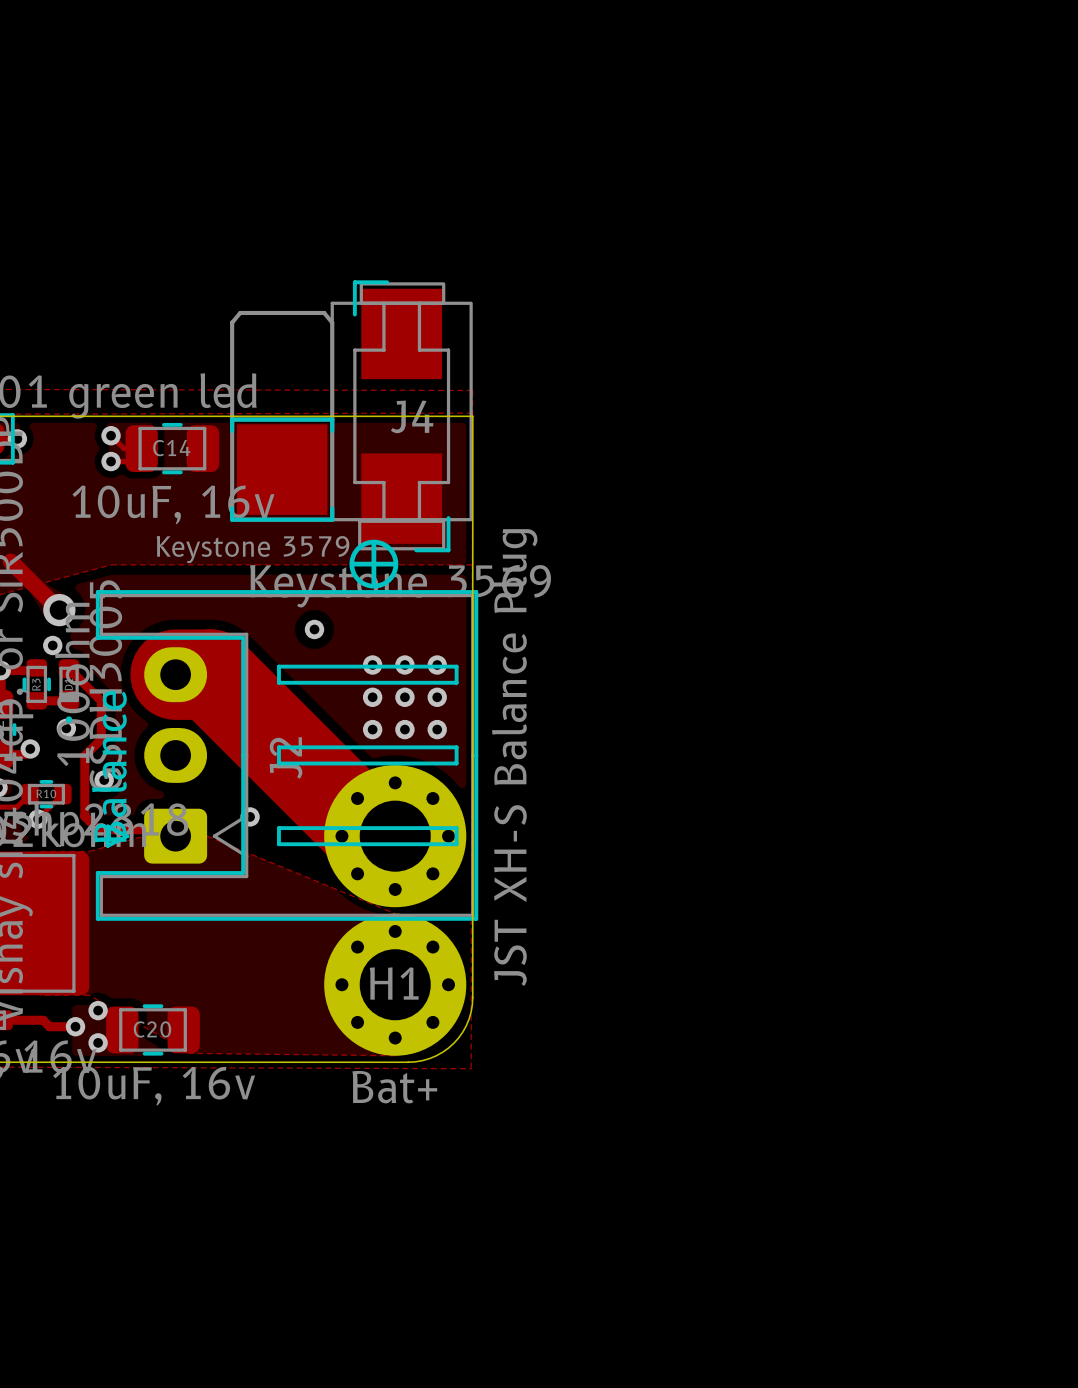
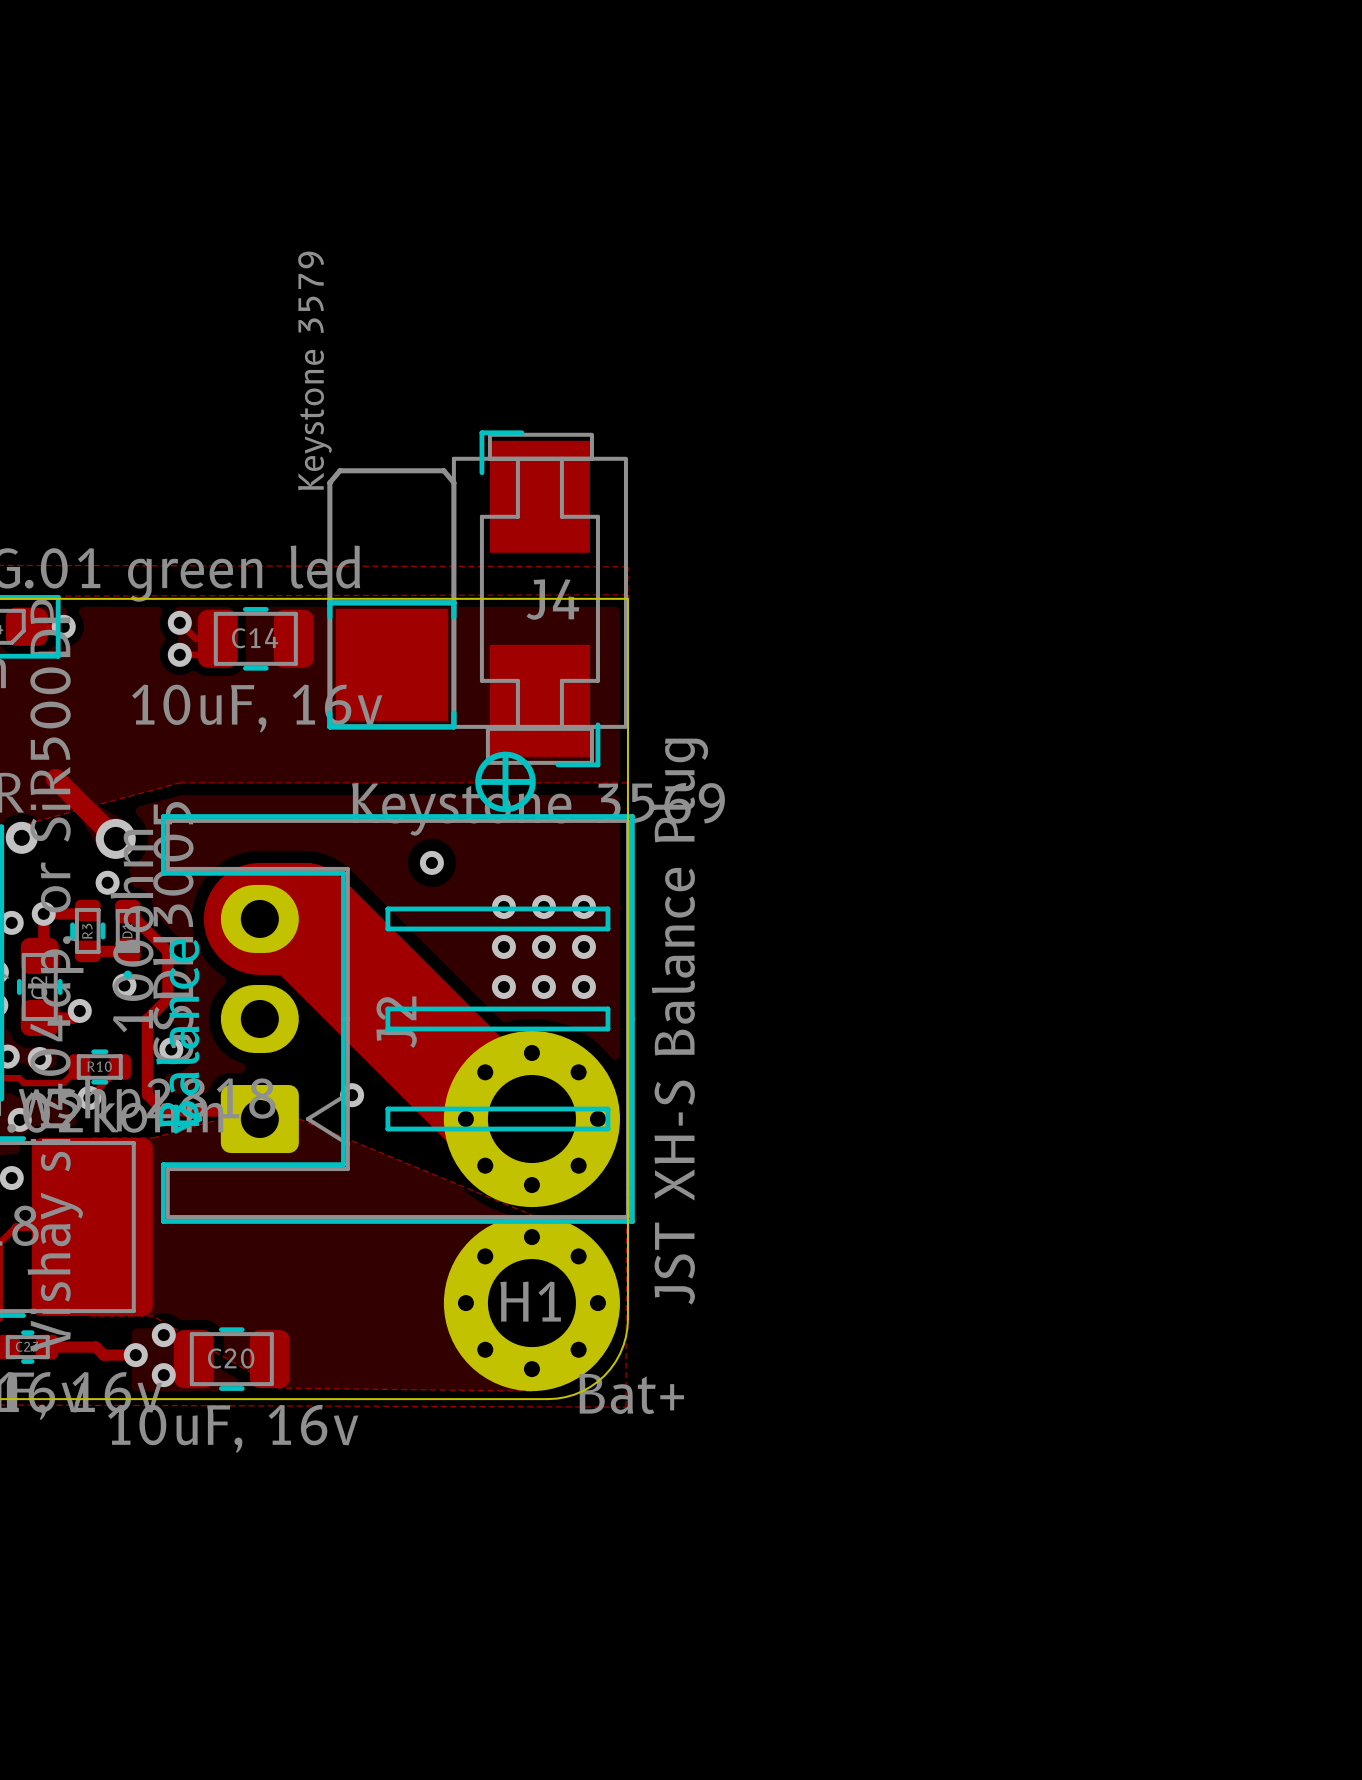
part value rotation: 0° (253, 549) -> 90° counterclockwise (314, 370)
part value position: Keystone 3579 (253, 549) -> Keystone 3579 (314, 370)
H1 value position: Bat+ (394, 1087) -> Bat+ (631, 1393)

